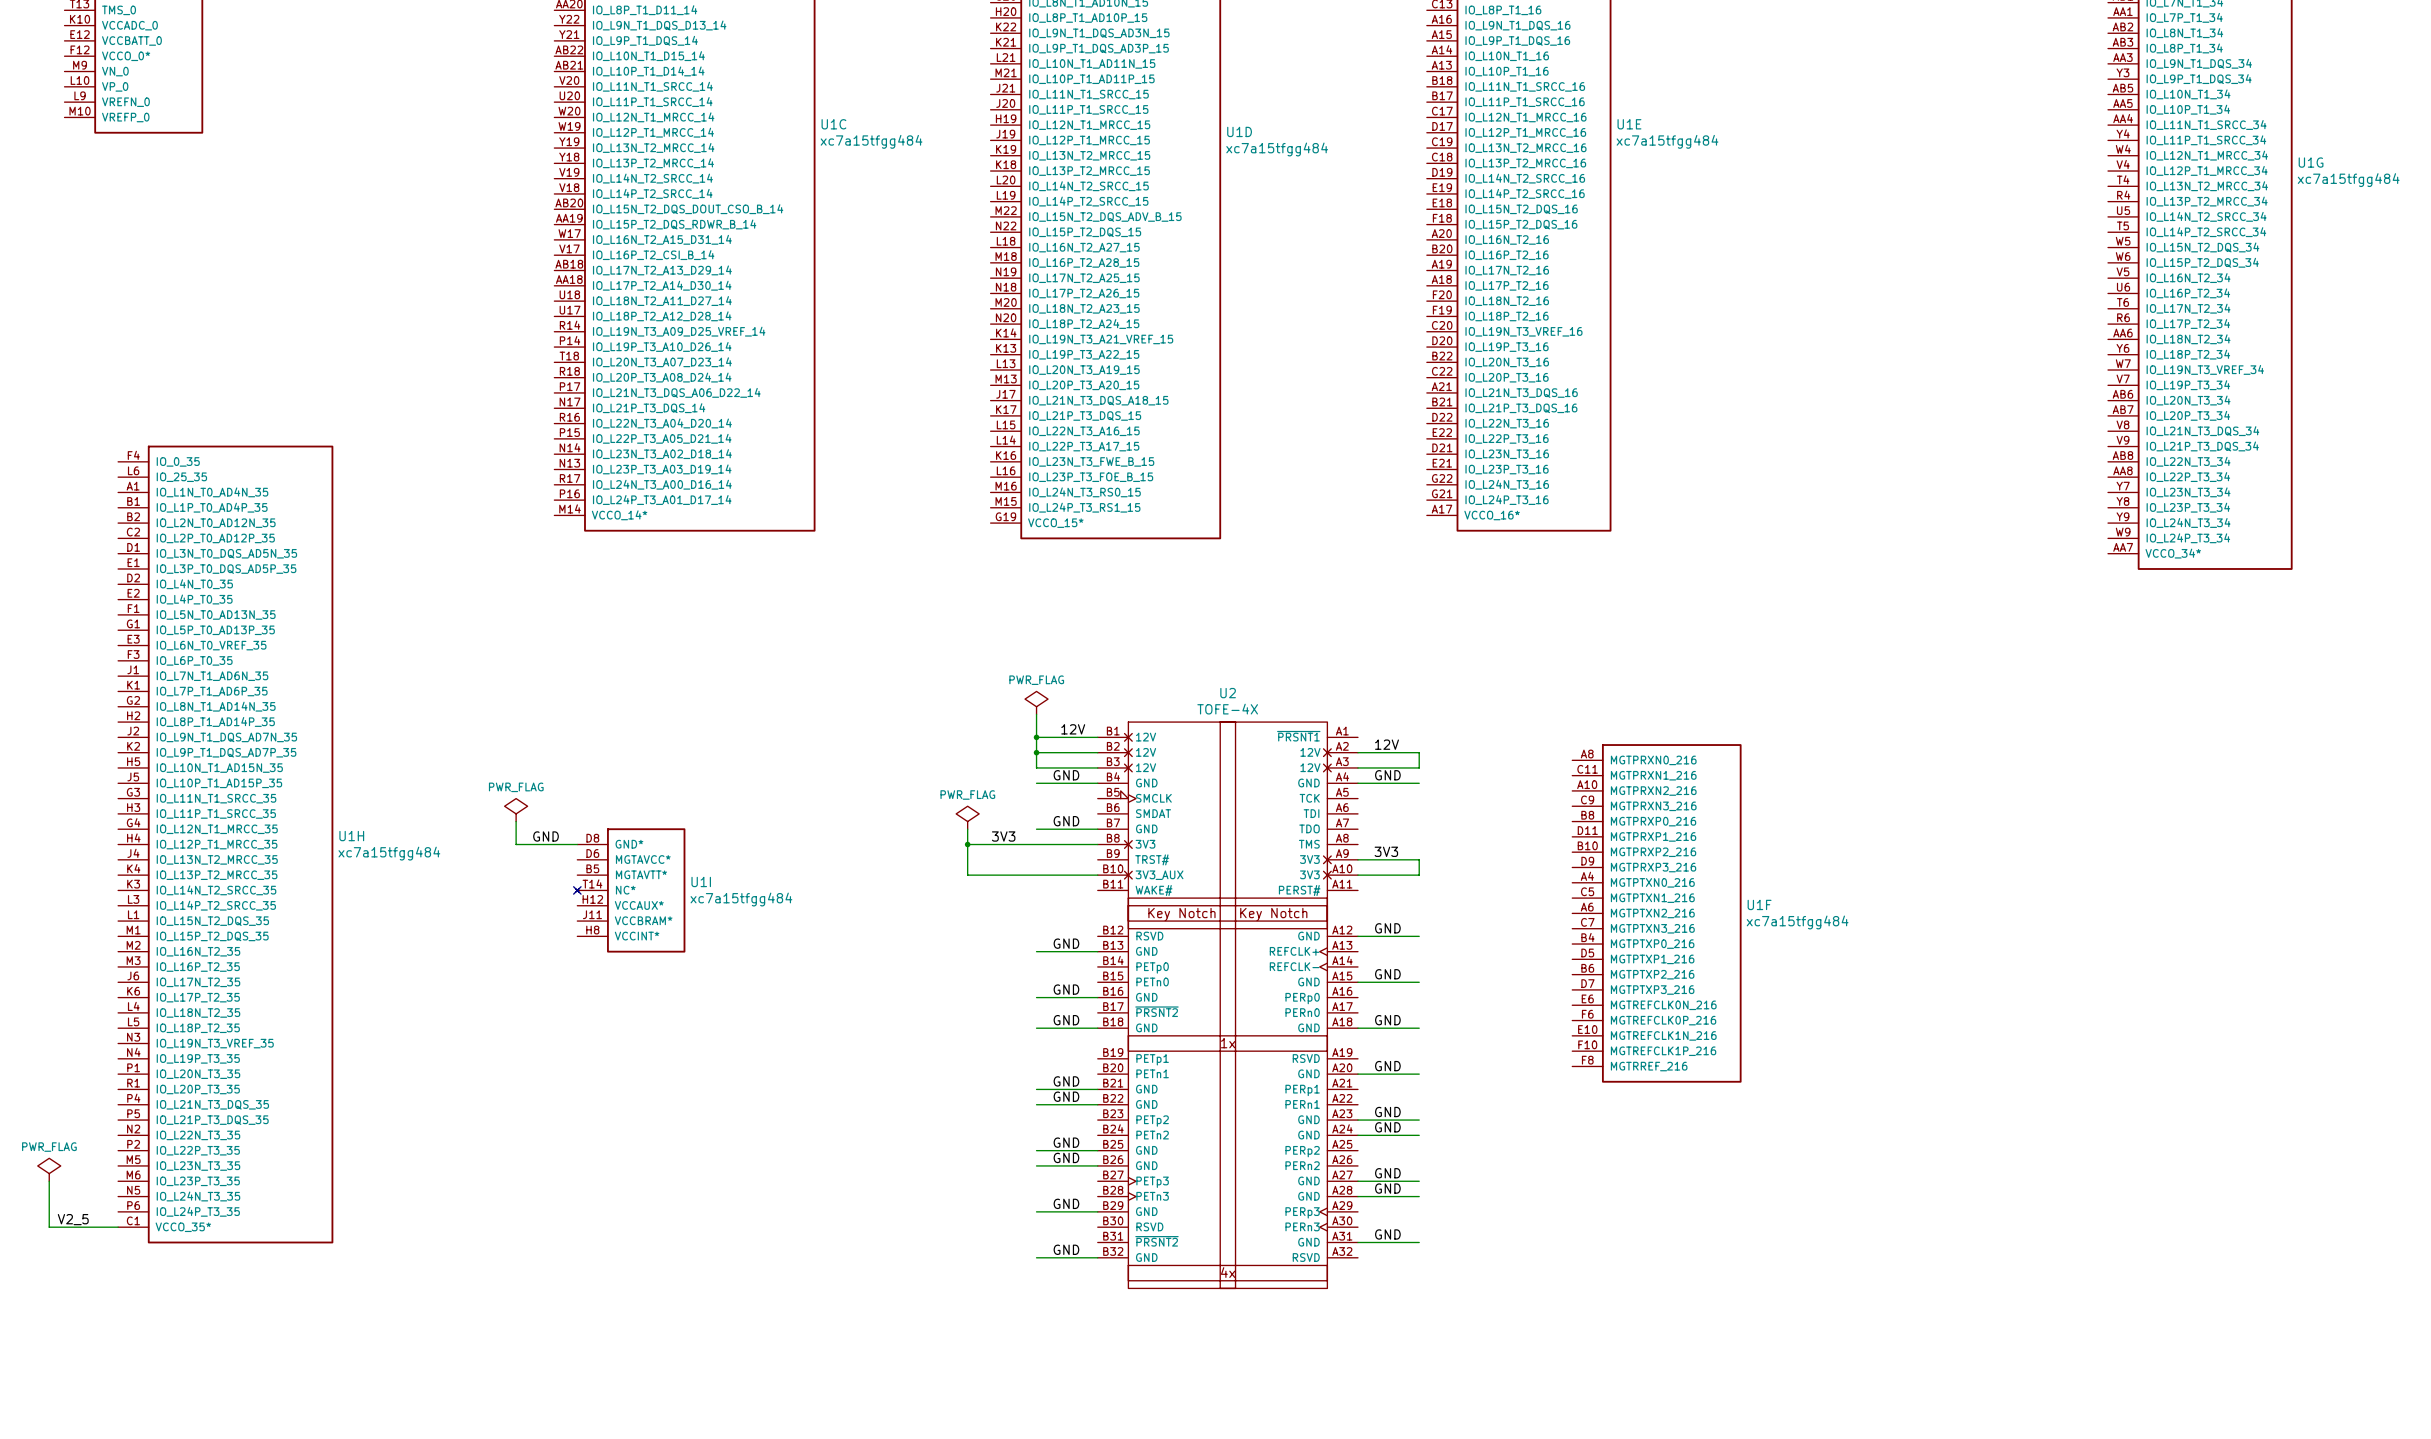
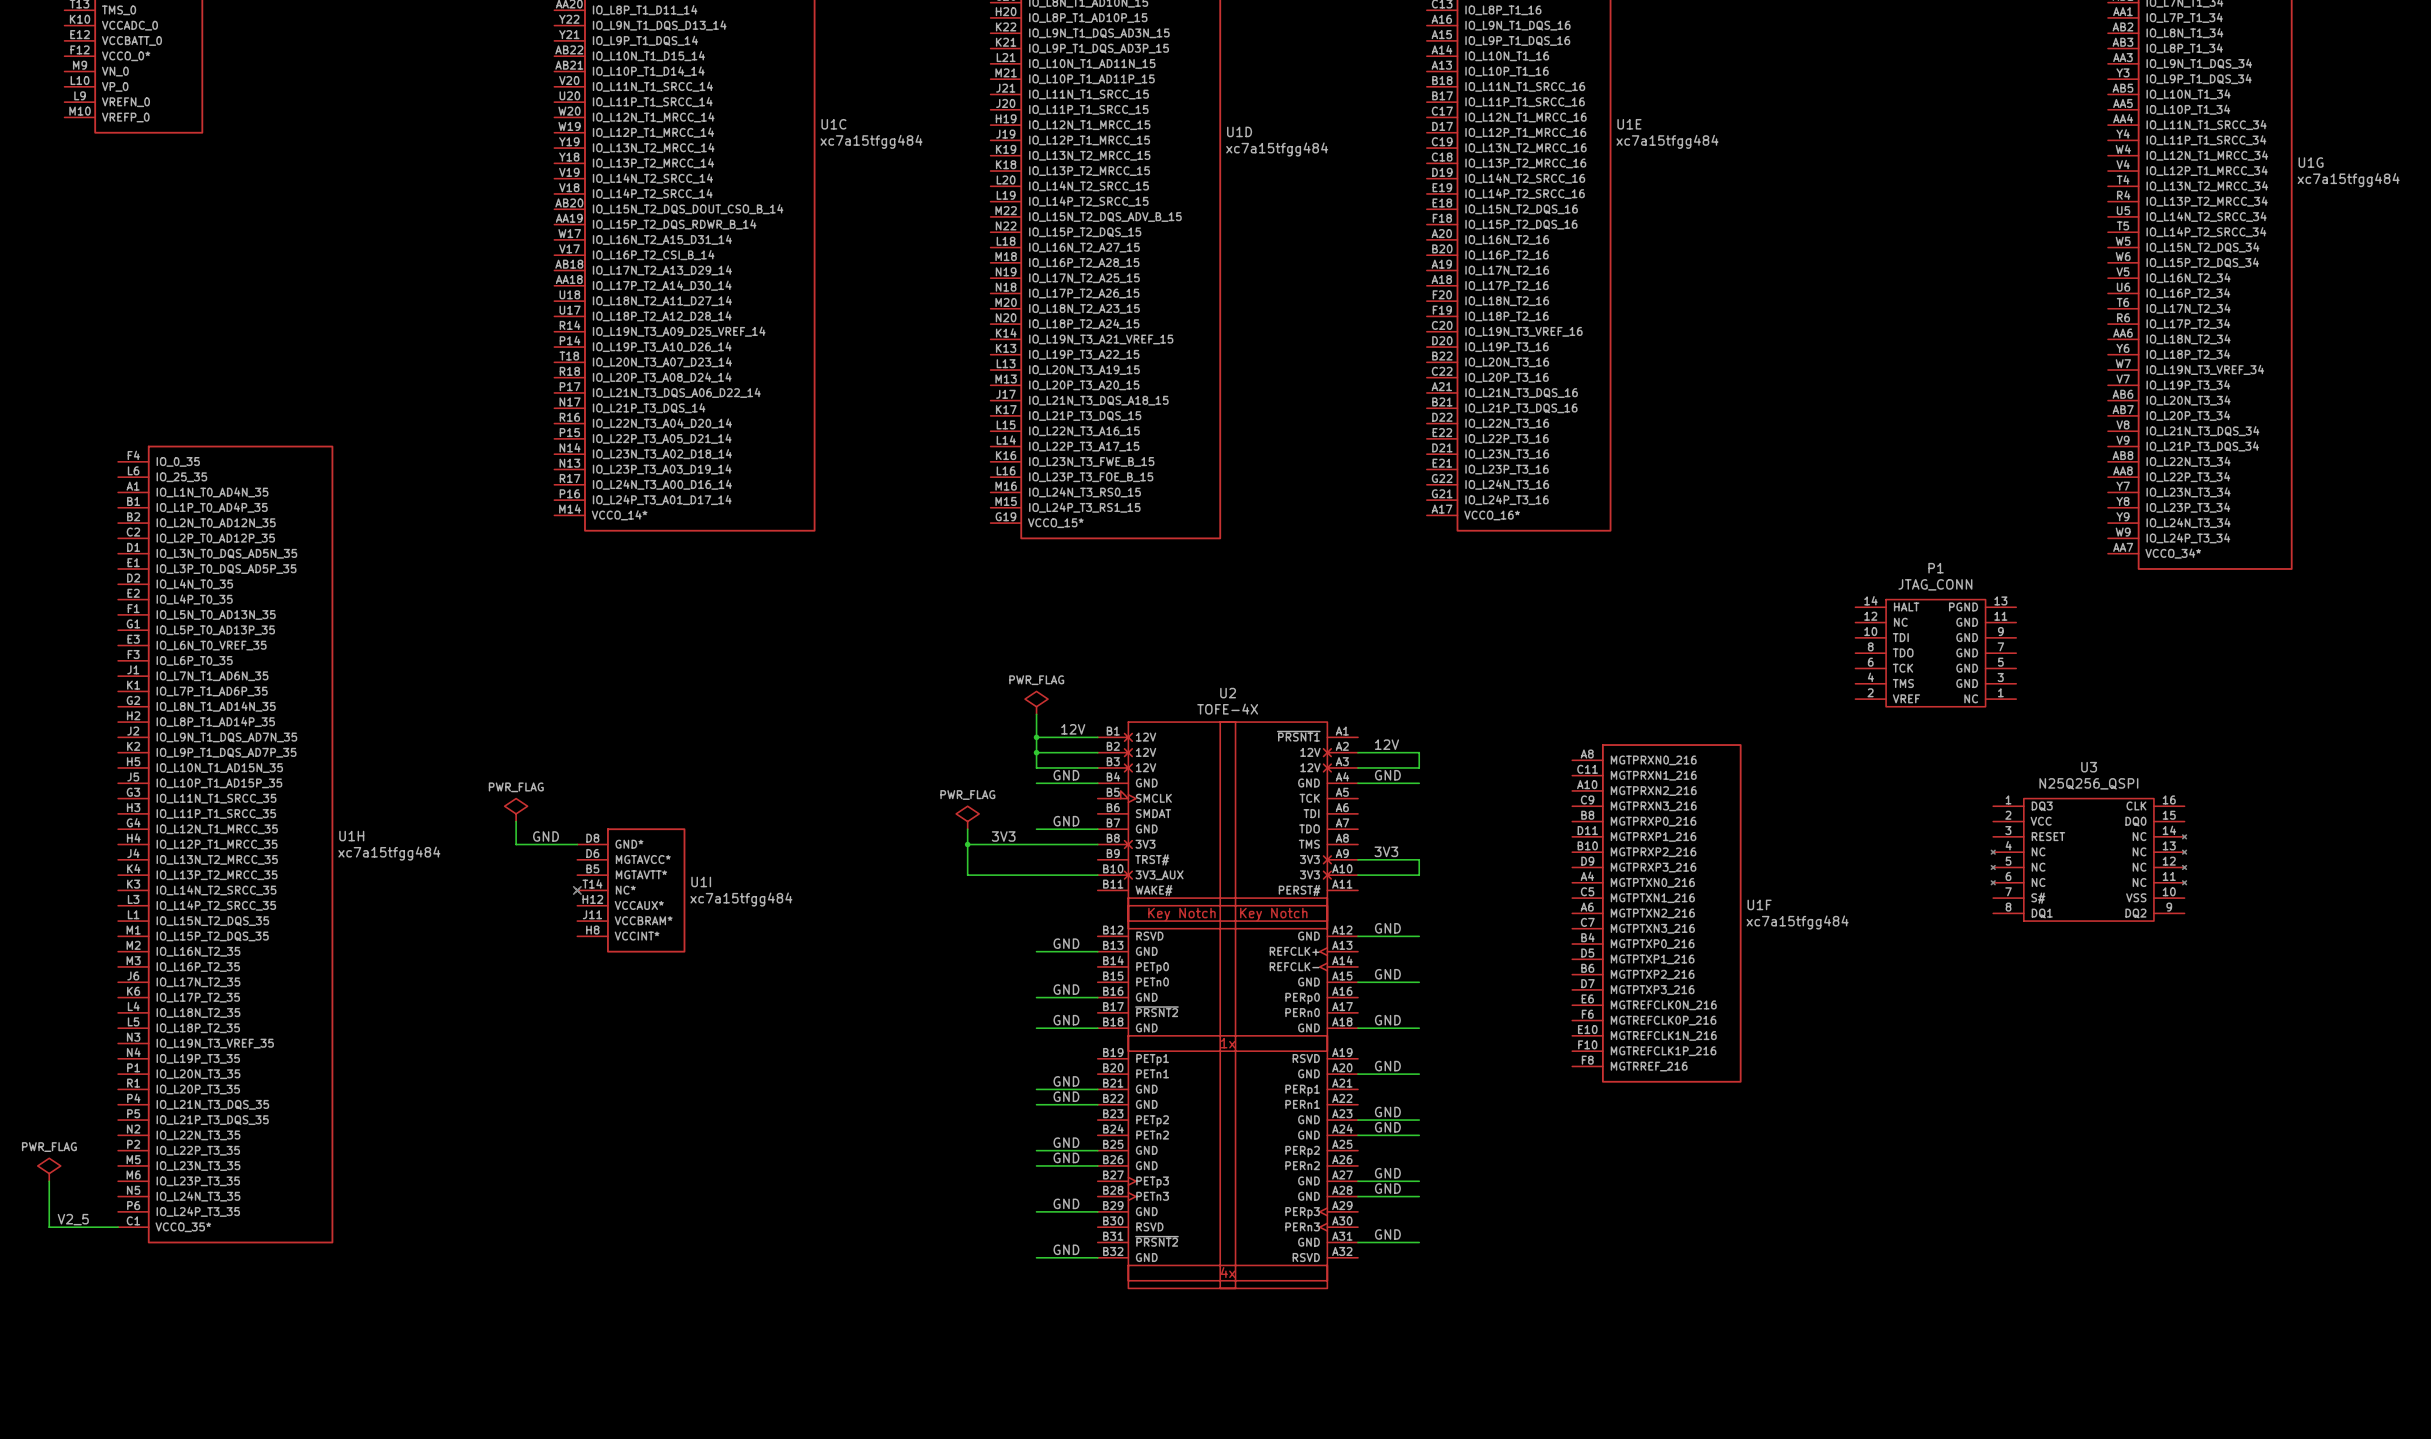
P1: none -> JTAG_CONN (1935, 653)
U3: none -> N25Q256_QSPI (2088, 859)

